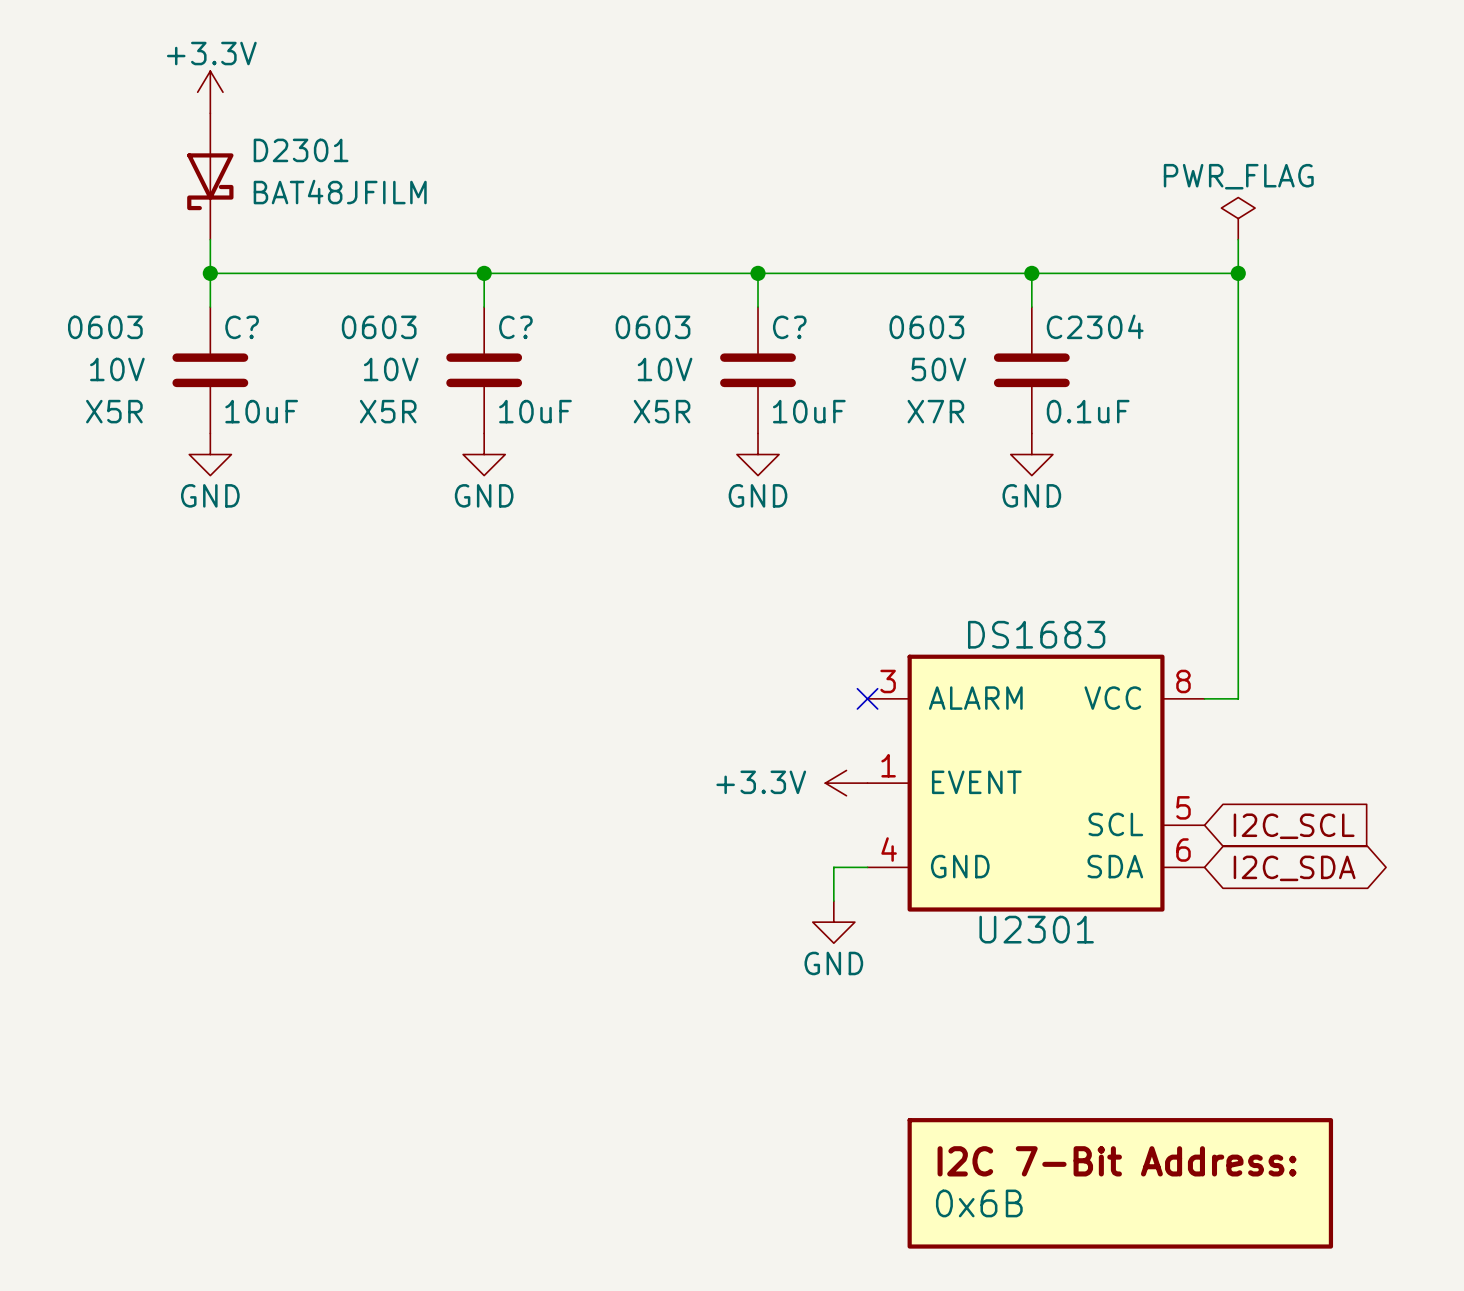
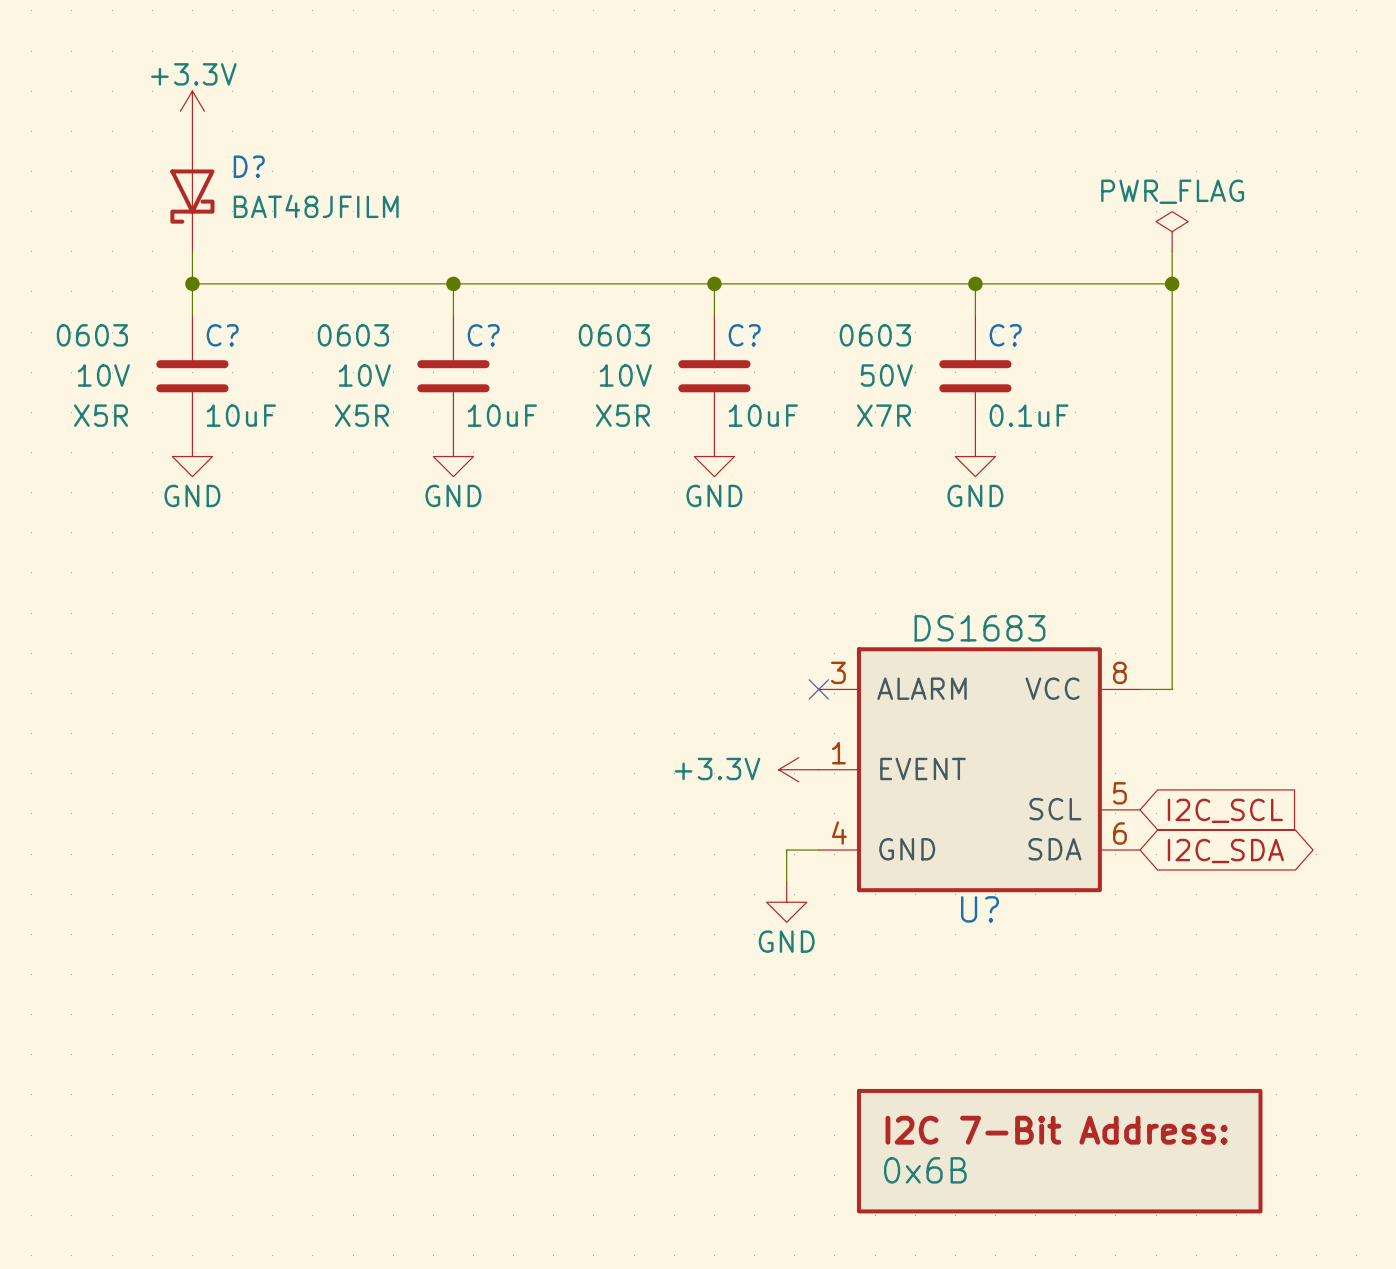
D2301 name: D2301 (301, 150) -> D? (249, 166)
C2304 name: C2304 (1095, 326) -> C? (1005, 335)
U2301 name: U2301 (1036, 929) -> U? (979, 909)

